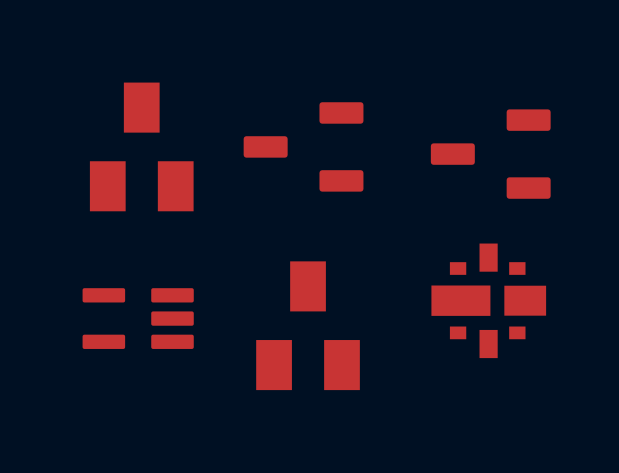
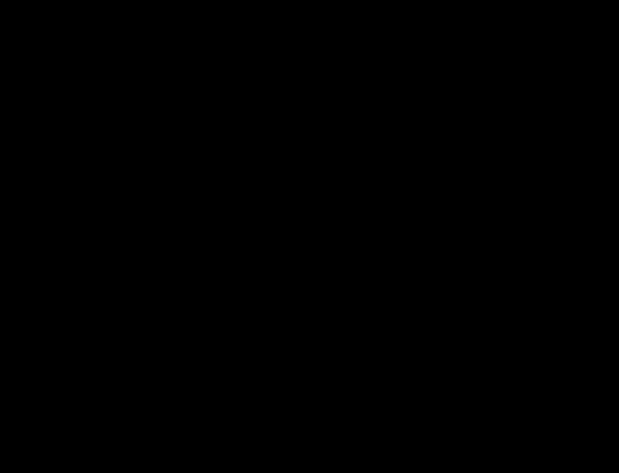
part: (141, 146) -> none
part: (303, 146) -> none
part: (490, 154) -> none
part: (488, 300) -> none
part: (138, 318) -> none
part: (308, 325) -> none

